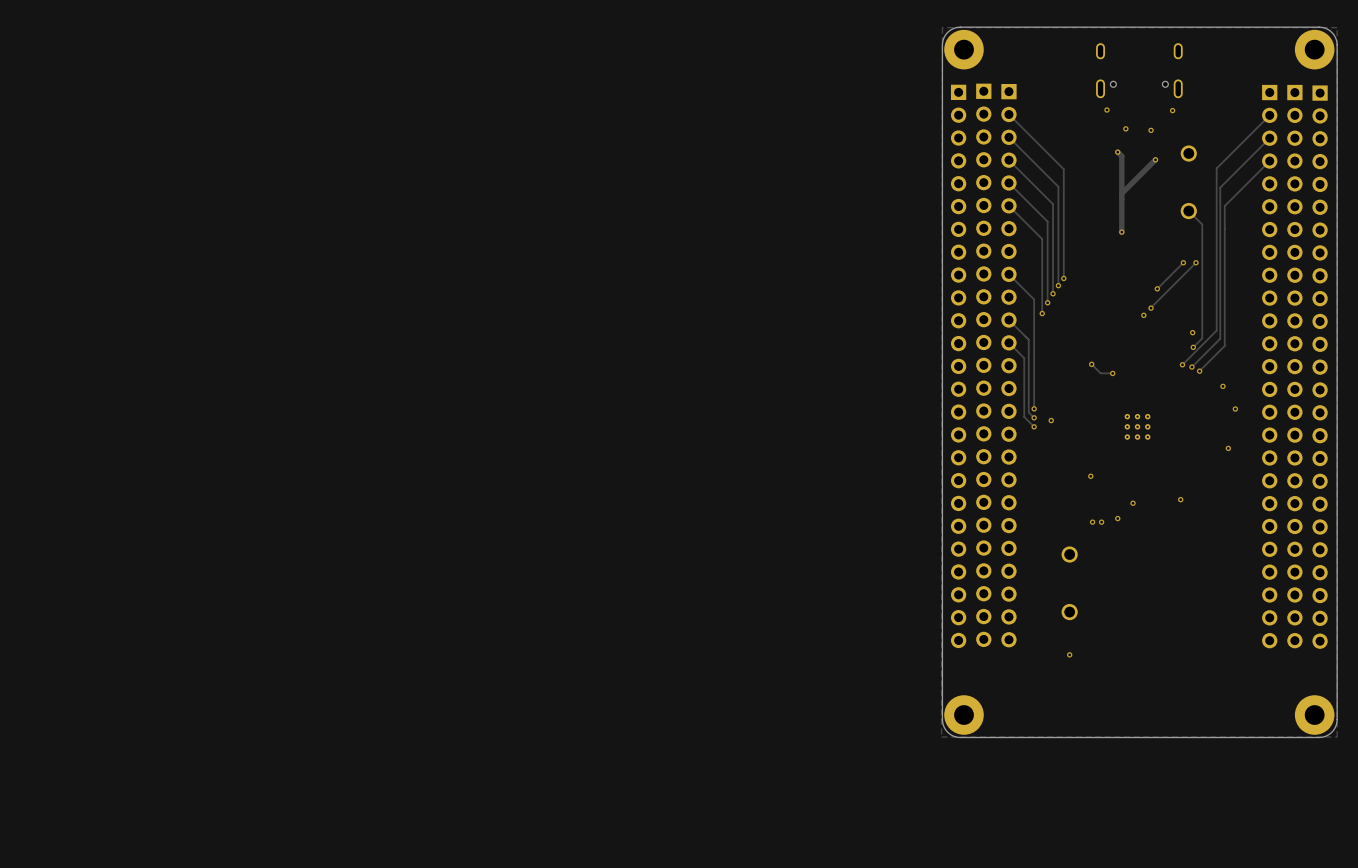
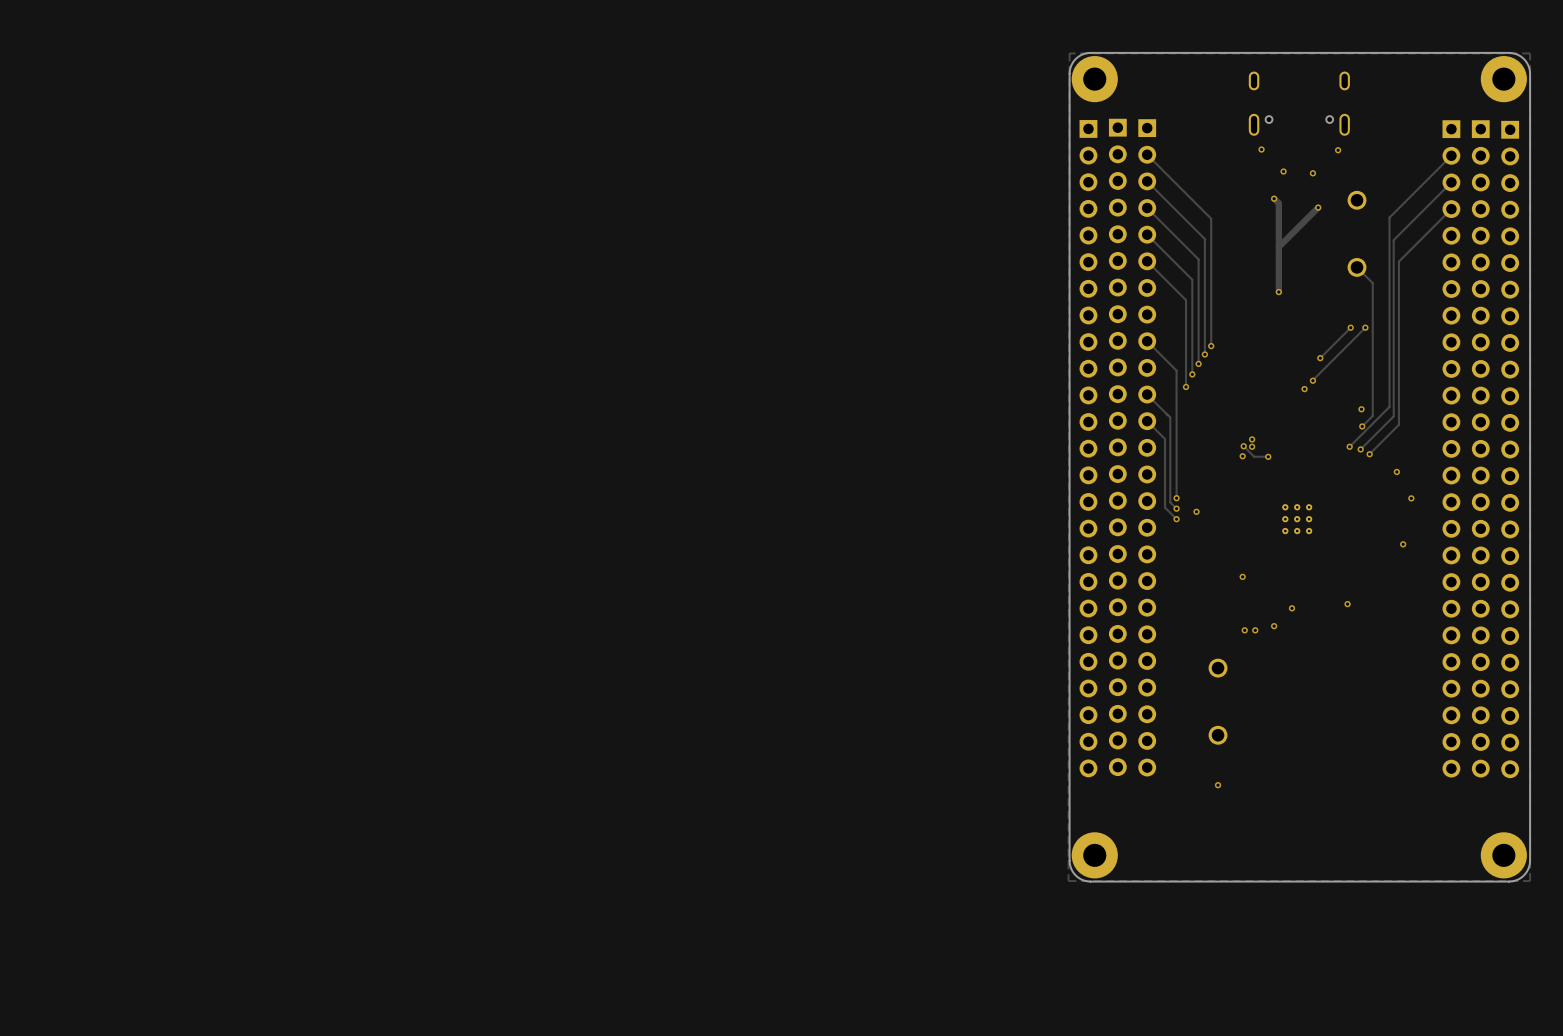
via: none -> (1252, 439)
via: none -> (1252, 446)
via: none -> (1242, 456)

